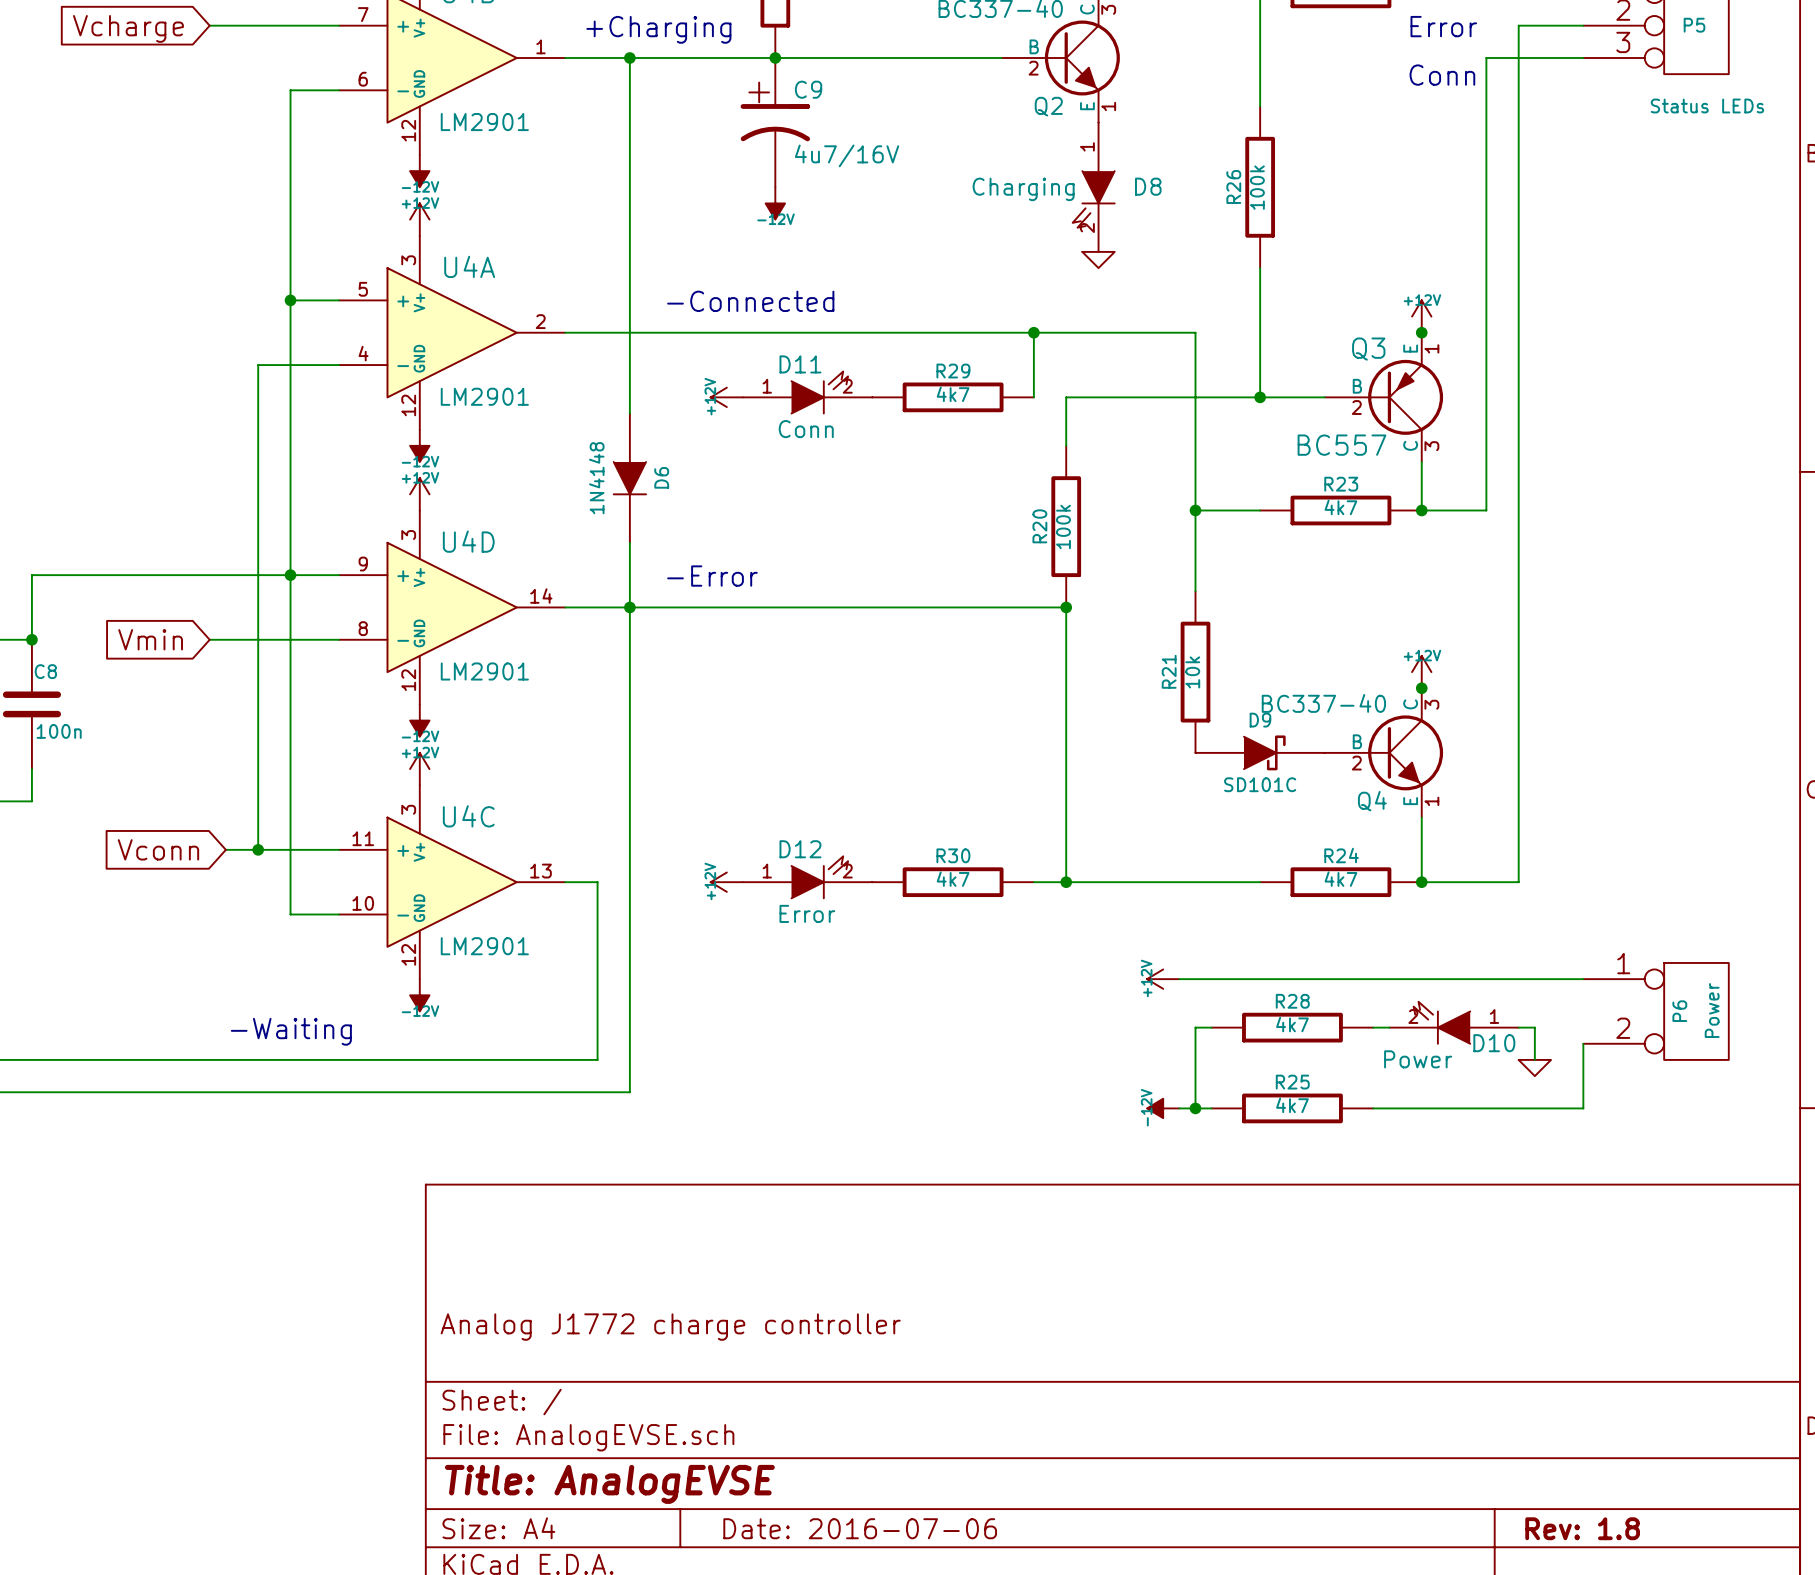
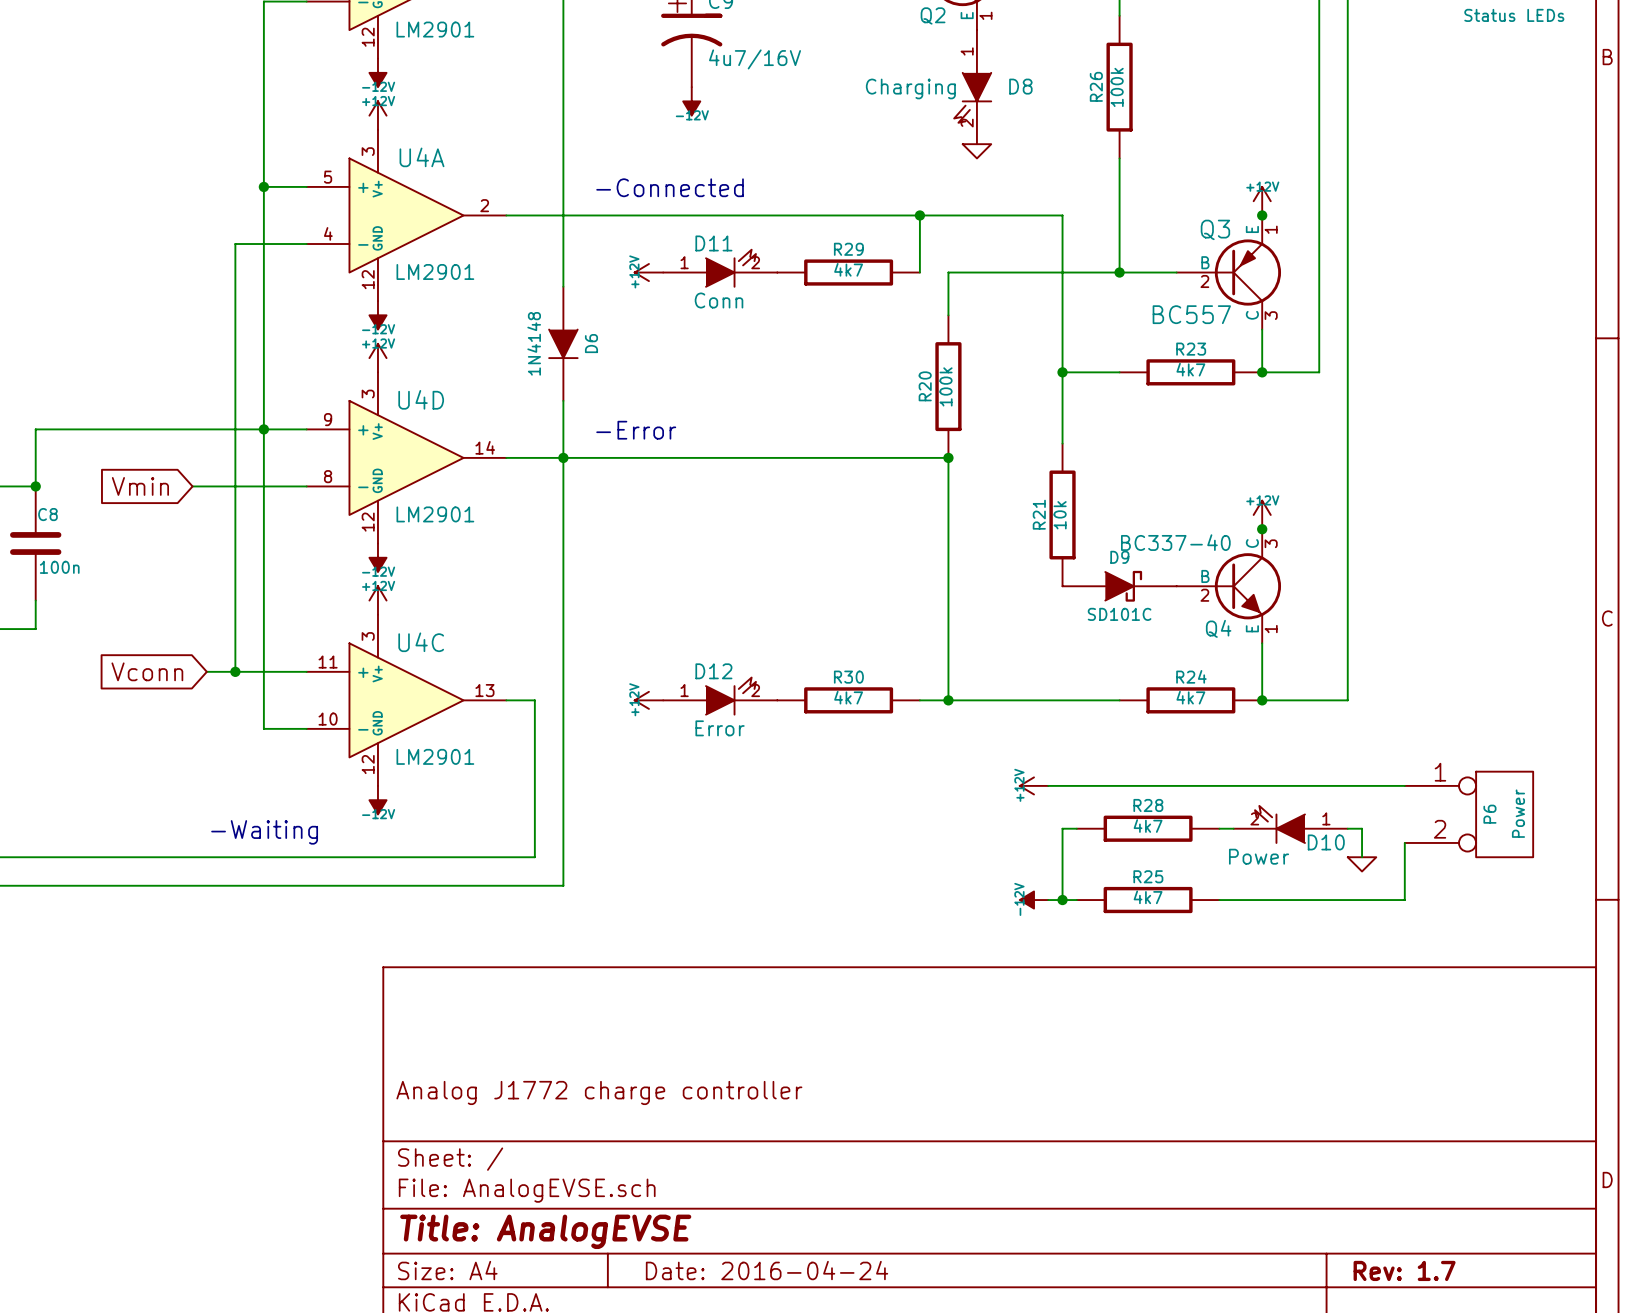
title block: Date: 2016-07-06 (860, 1528) -> Date: 2016-04-24 (767, 1270)
title block: Rev: 1.8 (1582, 1528) -> Rev: 1.7 (1404, 1270)

